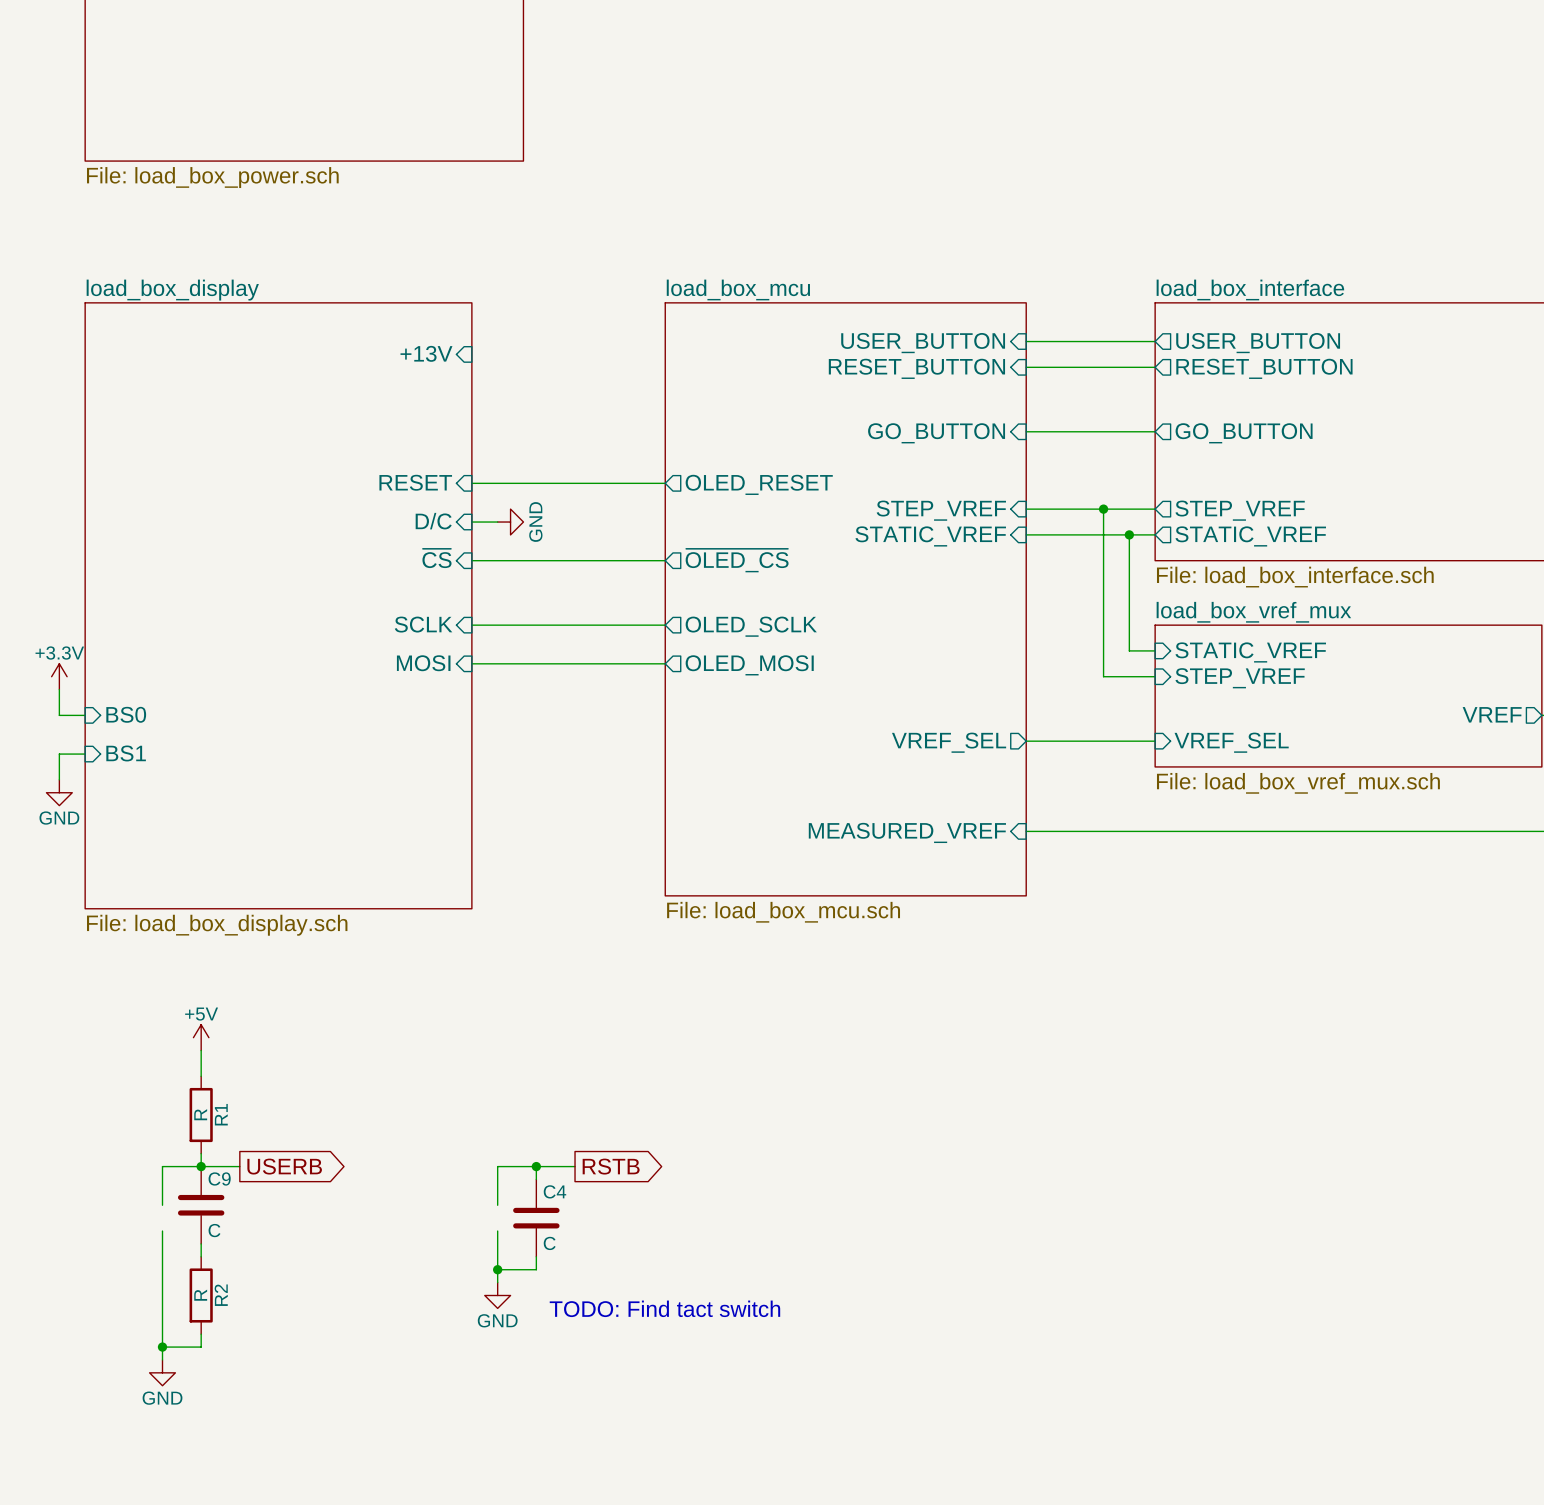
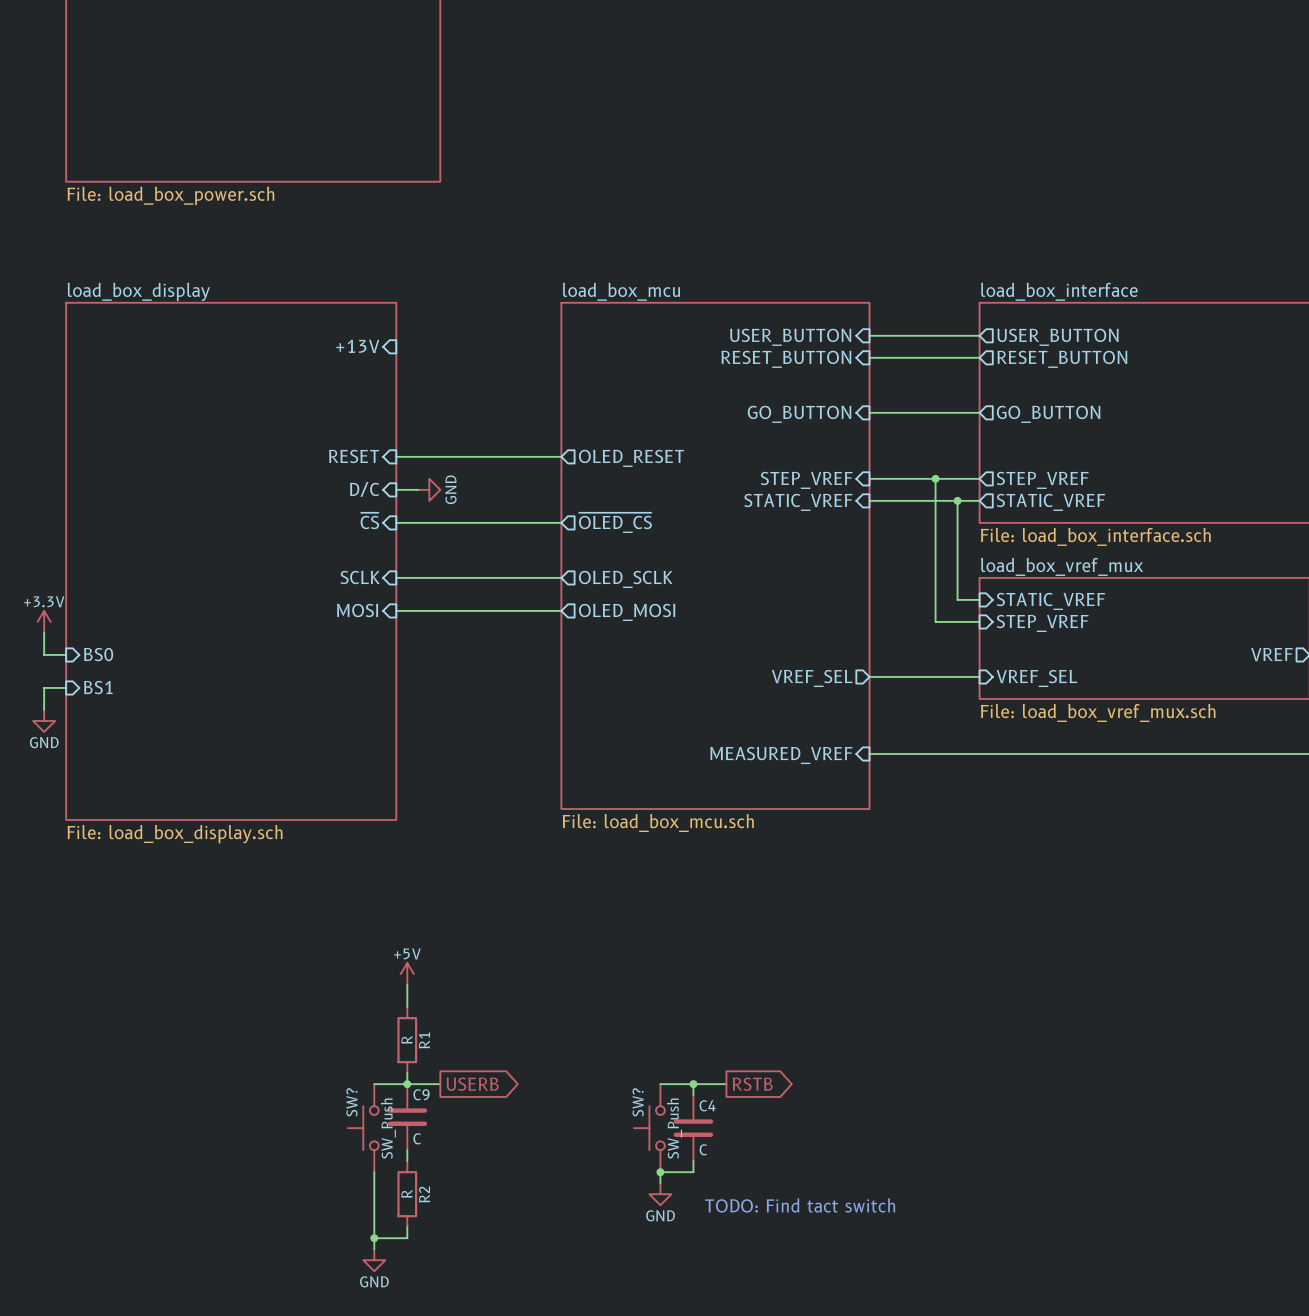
power symbol: +5V (201, 1037) -> none
wire: (201, 1050) (201, 1076) -> none
power symbol: none -> +5V (407, 974)
wire: none -> (407, 985) (407, 1007)
R1 position: (201, 1115) -> (407, 1040)
wire: (201, 1153) (201, 1166) -> none
junction: (201, 1166) -> none
wire: (239, 1166) (162, 1166) (162, 1205) -> none
global label: USERB (284, 1166) -> none
wire: (536, 1166) (536, 1179) -> (407, 1150) (407, 1161)
junction: (536, 1166) -> none
wire: (575, 1166) (497, 1166) (497, 1205) -> none
global label: RSTB (611, 1166) -> none
C9 position: (201, 1205) -> (407, 1117)
wire: none -> (407, 1073) (407, 1084)
wire: none -> (374, 1084) (440, 1084)
junction: none -> (407, 1084)
C4 position: (536, 1218) -> (693, 1128)
global label: none -> USERB (472, 1084)
wire: none -> (660, 1084) (726, 1084)
wire: none -> (693, 1084) (693, 1095)
junction: none -> (693, 1084)
global label: none -> RSTB (752, 1084)
wire: (162, 1231) (162, 1359) -> none
wire: (497, 1231) (497, 1282) -> none
wire: (201, 1243) (201, 1256) -> none
wire: (536, 1256) (536, 1269) (497, 1269) -> (407, 1227) (407, 1238) (374, 1238)
SW?: none -> SW_Push (363, 1128)
junction: (497, 1269) -> none
SW?: none -> SW_Push (649, 1128)
R2 position: (201, 1295) -> (407, 1194)
power symbol position: GND (497, 1295) -> GND (374, 1260)
text: TODO: Find tact switch (664, 1308) -> none
wire: none -> (693, 1161) (693, 1172) (660, 1172) (660, 1183)
wire: none -> (374, 1172) (374, 1249)
junction: none -> (660, 1172)
wire: (201, 1334) (201, 1347) (162, 1347) -> none
junction: (162, 1347) -> none
power symbol: none -> GND (660, 1194)
text: none -> TODO: Find tact switch (800, 1205)
power symbol: GND (162, 1372) -> none
junction: none -> (374, 1238)

